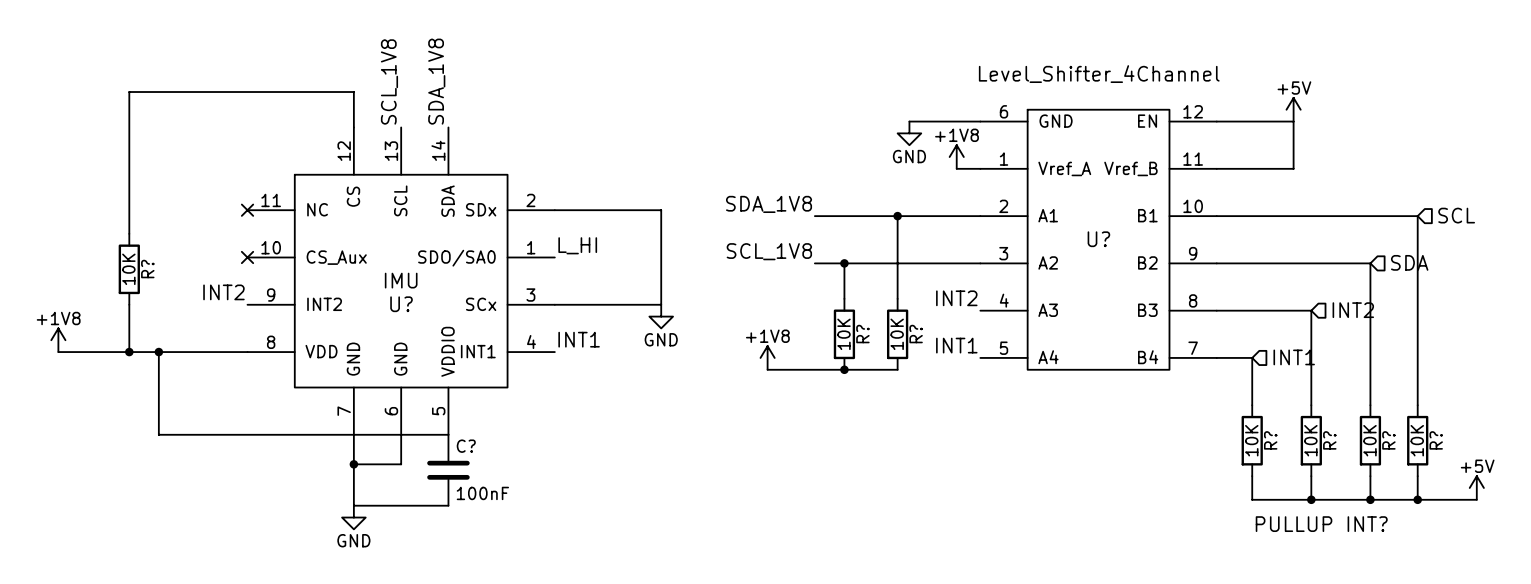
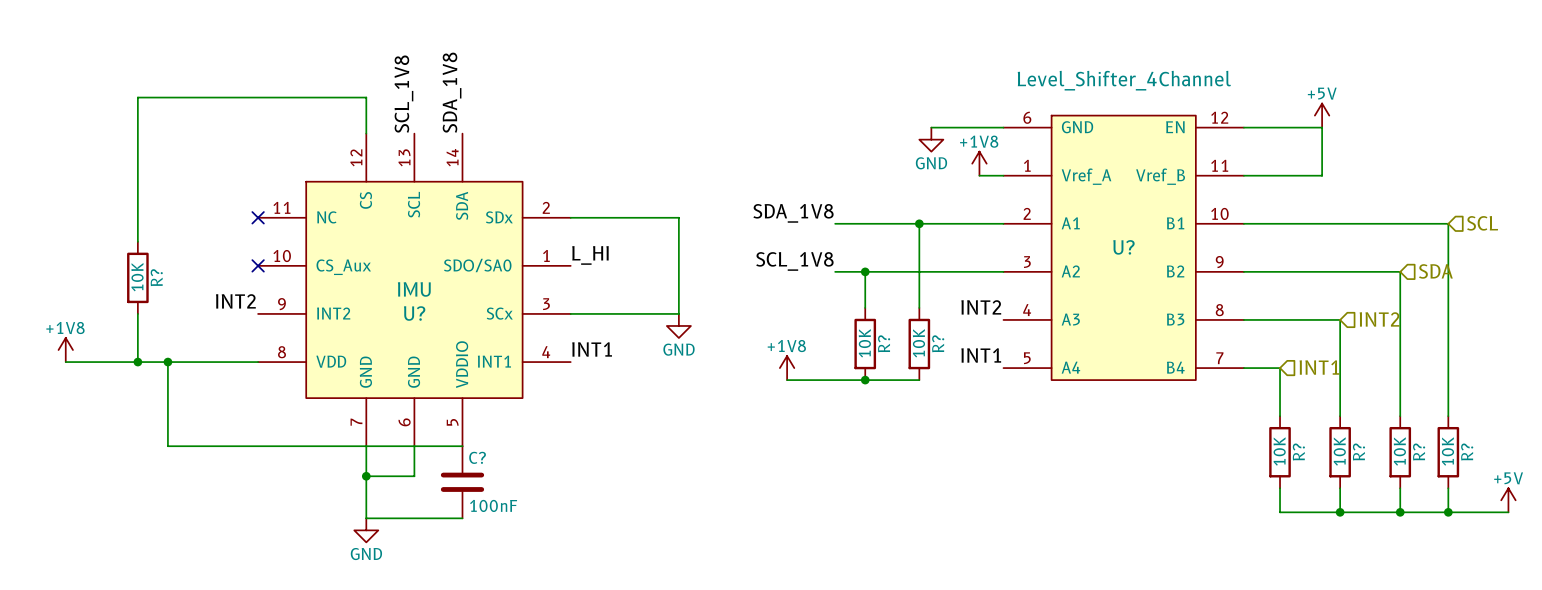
text: PULLUP INT? (1321, 524) -> none

